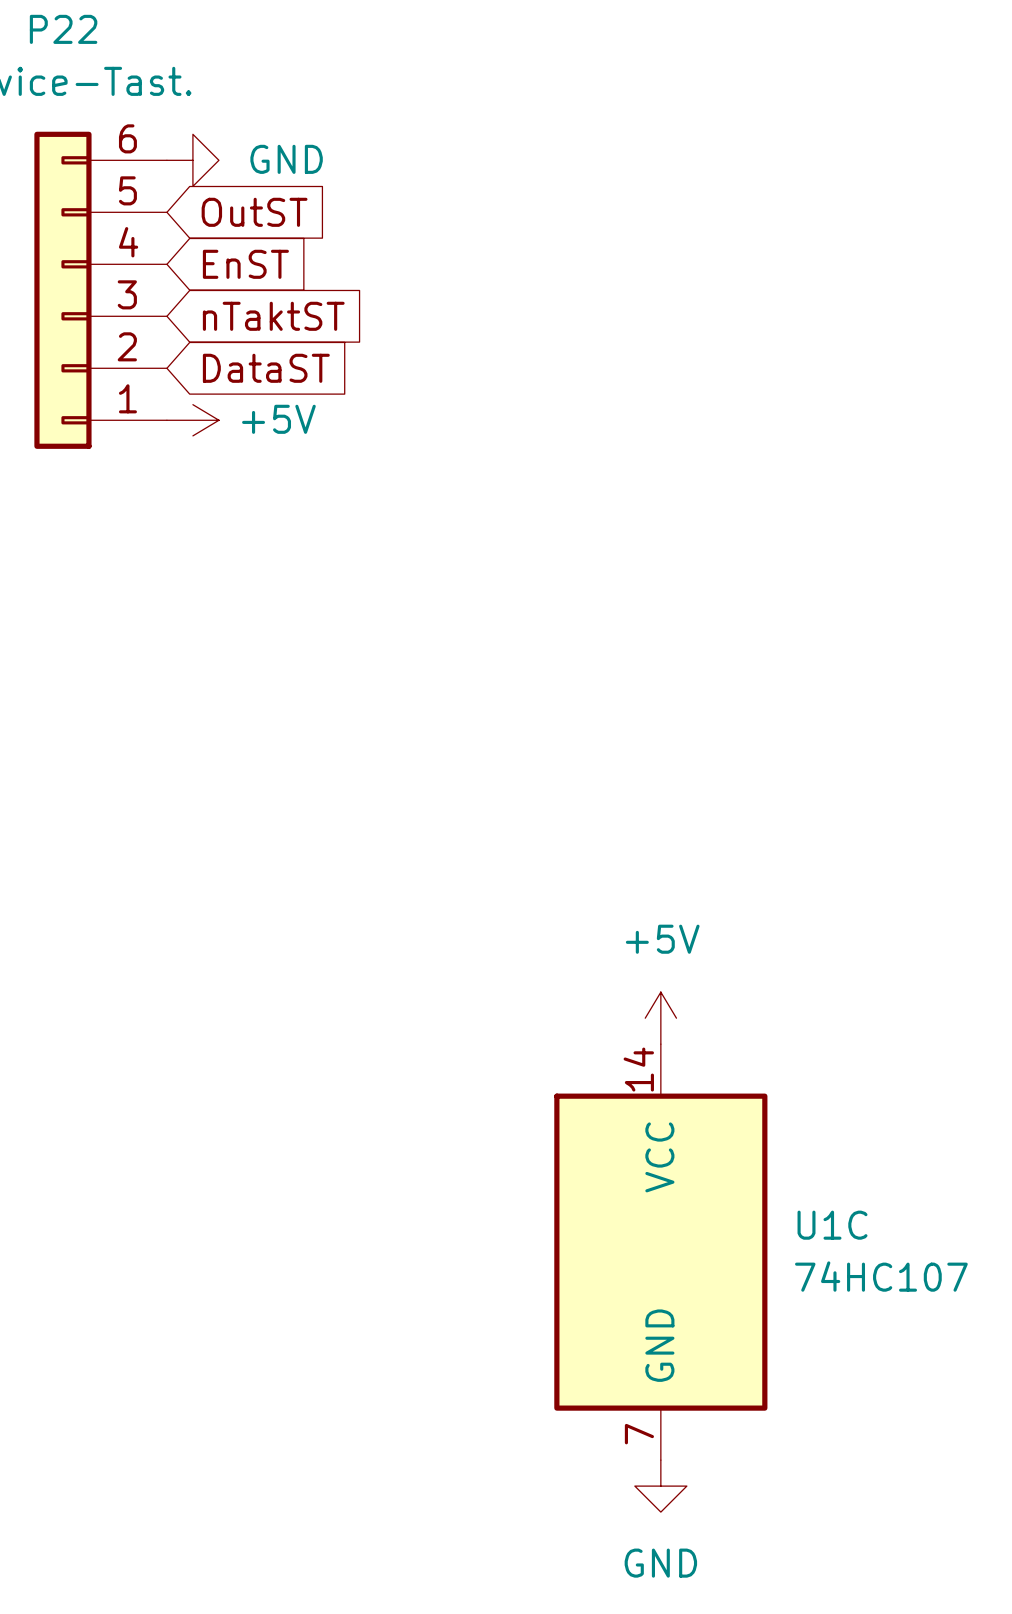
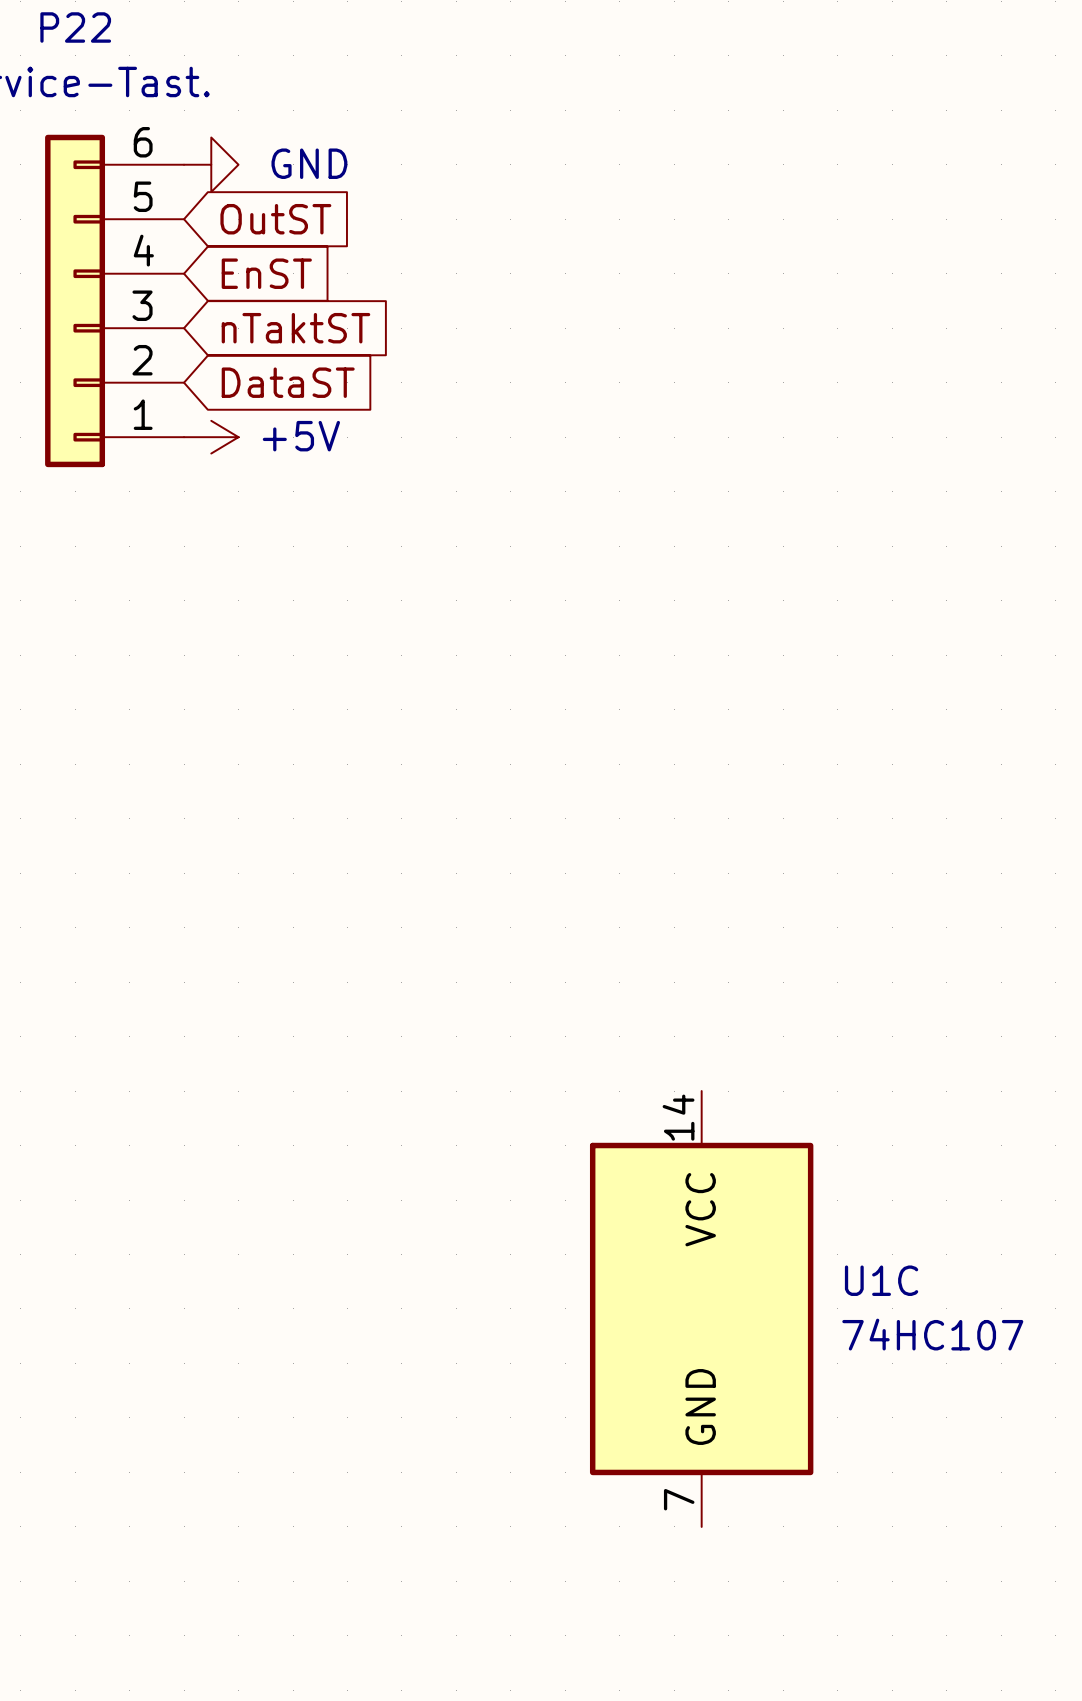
power symbol: +5V (660, 1018) -> none
power symbol: GND (660, 1486) -> none

